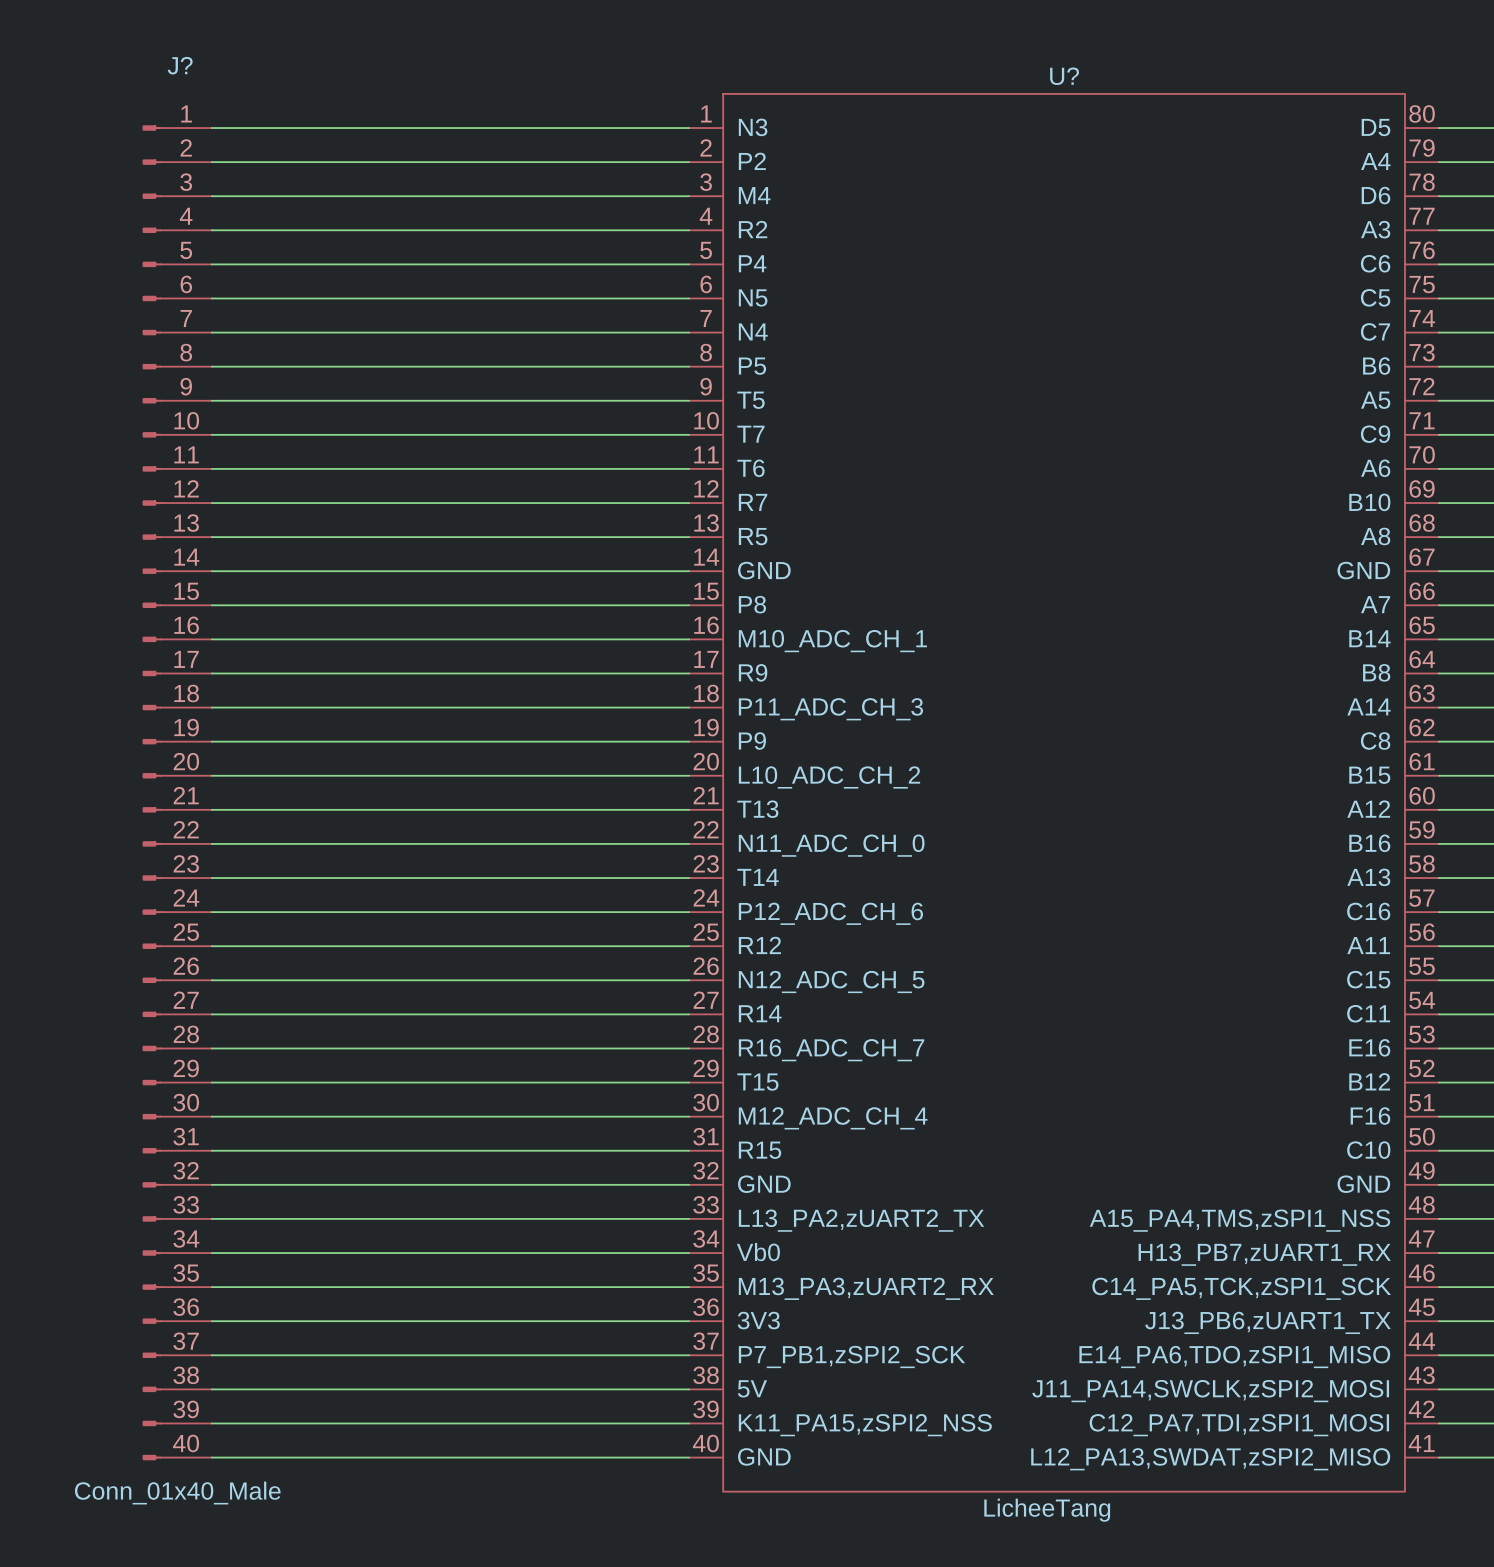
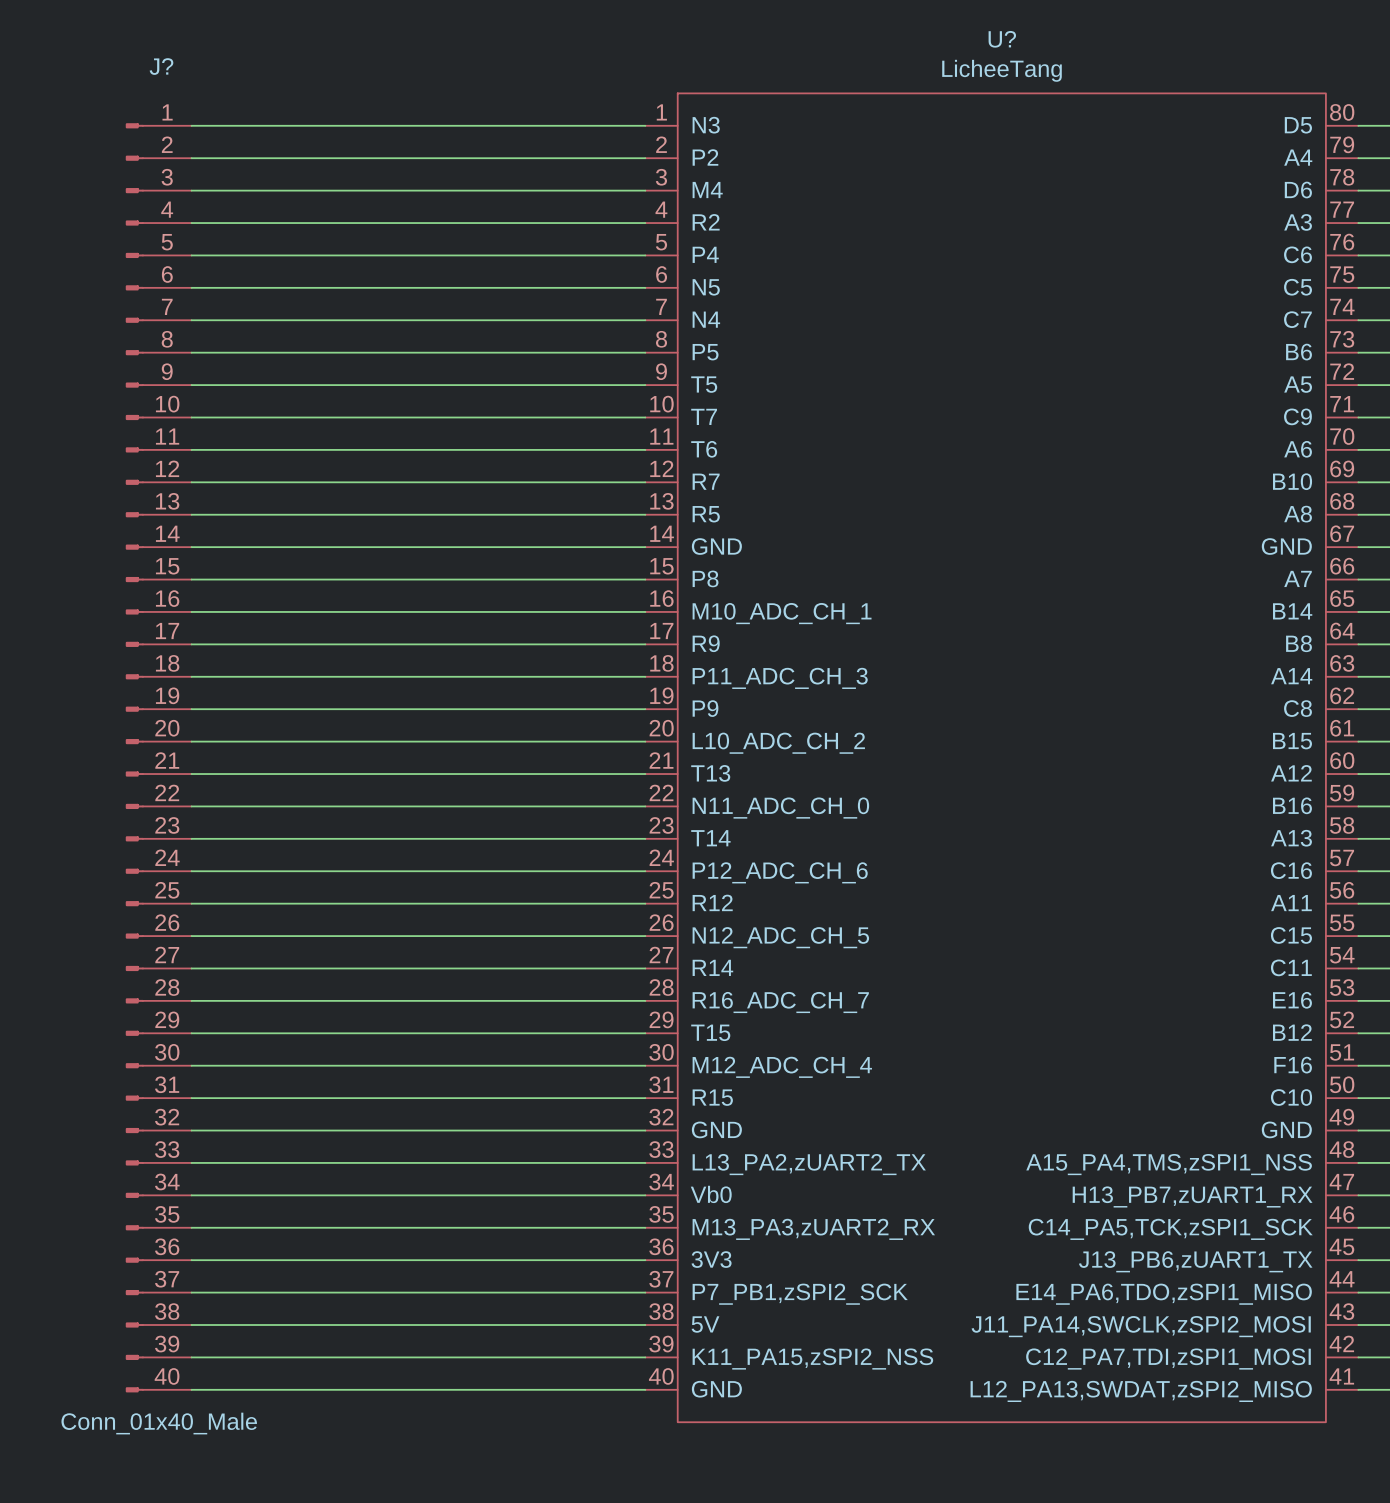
U? name position: U? (1064, 76) -> U? (1002, 39)
U? value position: LicheeTang (1047, 1510) -> LicheeTang (1002, 70)

